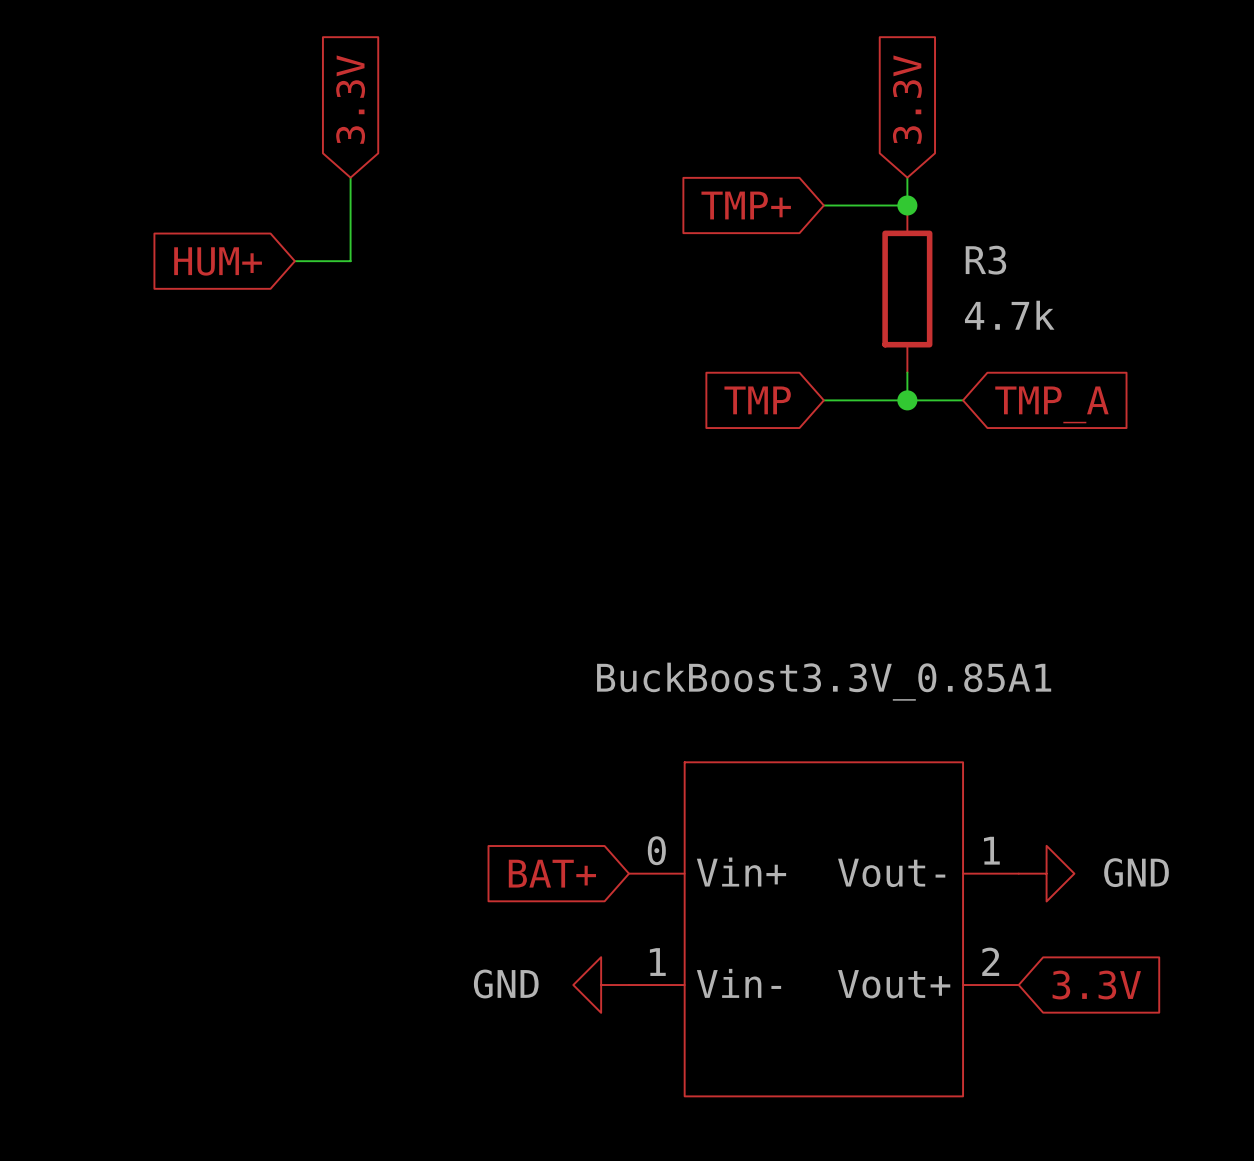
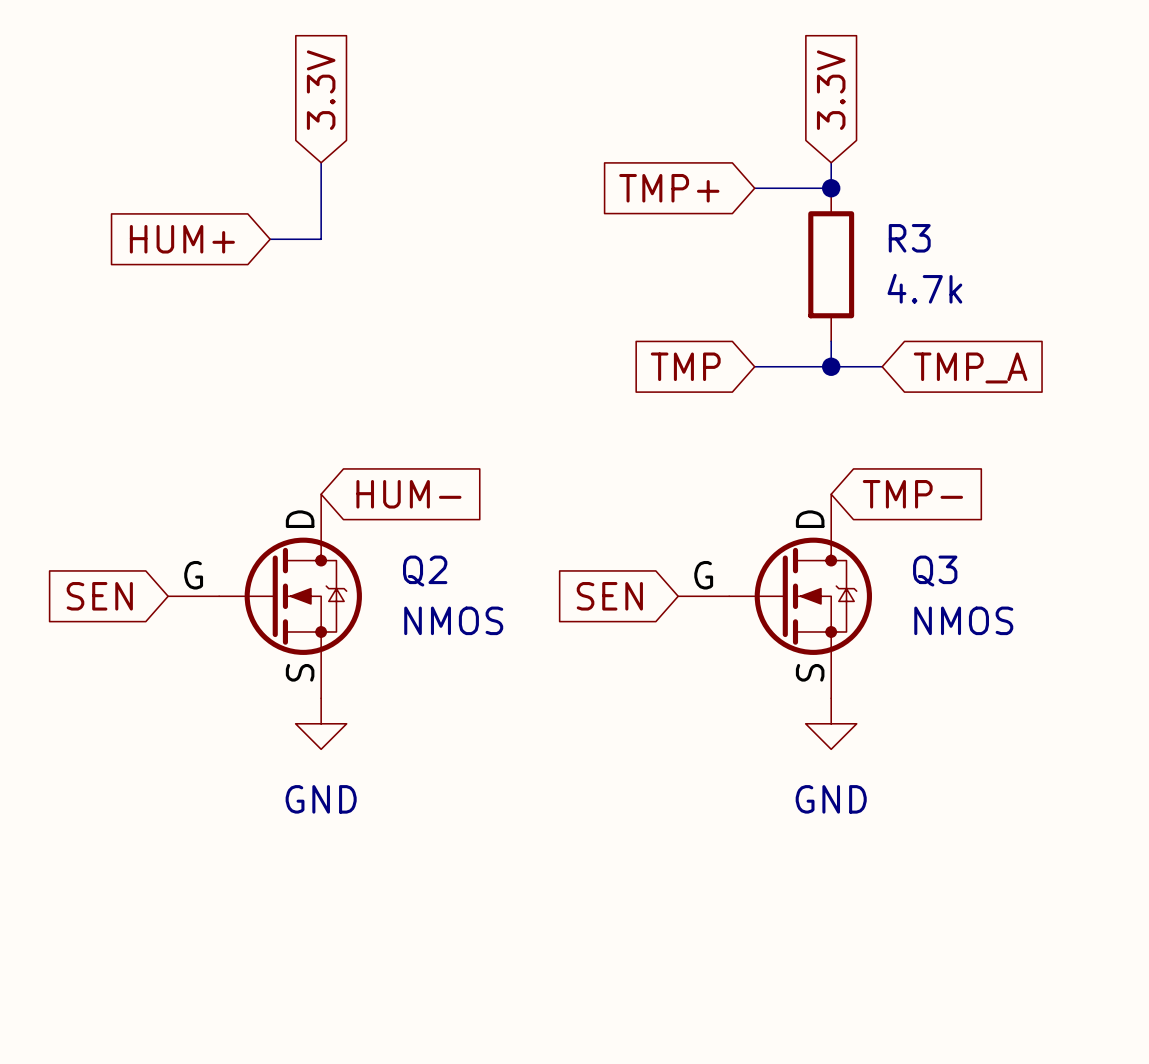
global label: none -> HUM- (408, 494)
global label: none -> TMP- (912, 494)
global label: none -> SEN (99, 596)
Q2: none -> NMOS (265, 596)
global label: none -> SEN (609, 596)
Q3: none -> NMOS (775, 596)
power symbol: none -> GND (321, 723)
global label: BAT+ (552, 873) -> none
power symbol rotation: 0° (1046, 873) -> 90° clockwise (831, 723)
power symbol position: GND (1046, 873) -> GND (831, 723)
BuckBoost3.3V_0.85A1: (823, 929) -> none
power symbol: GND (601, 985) -> none
global label: 3.3V (1096, 985) -> none

